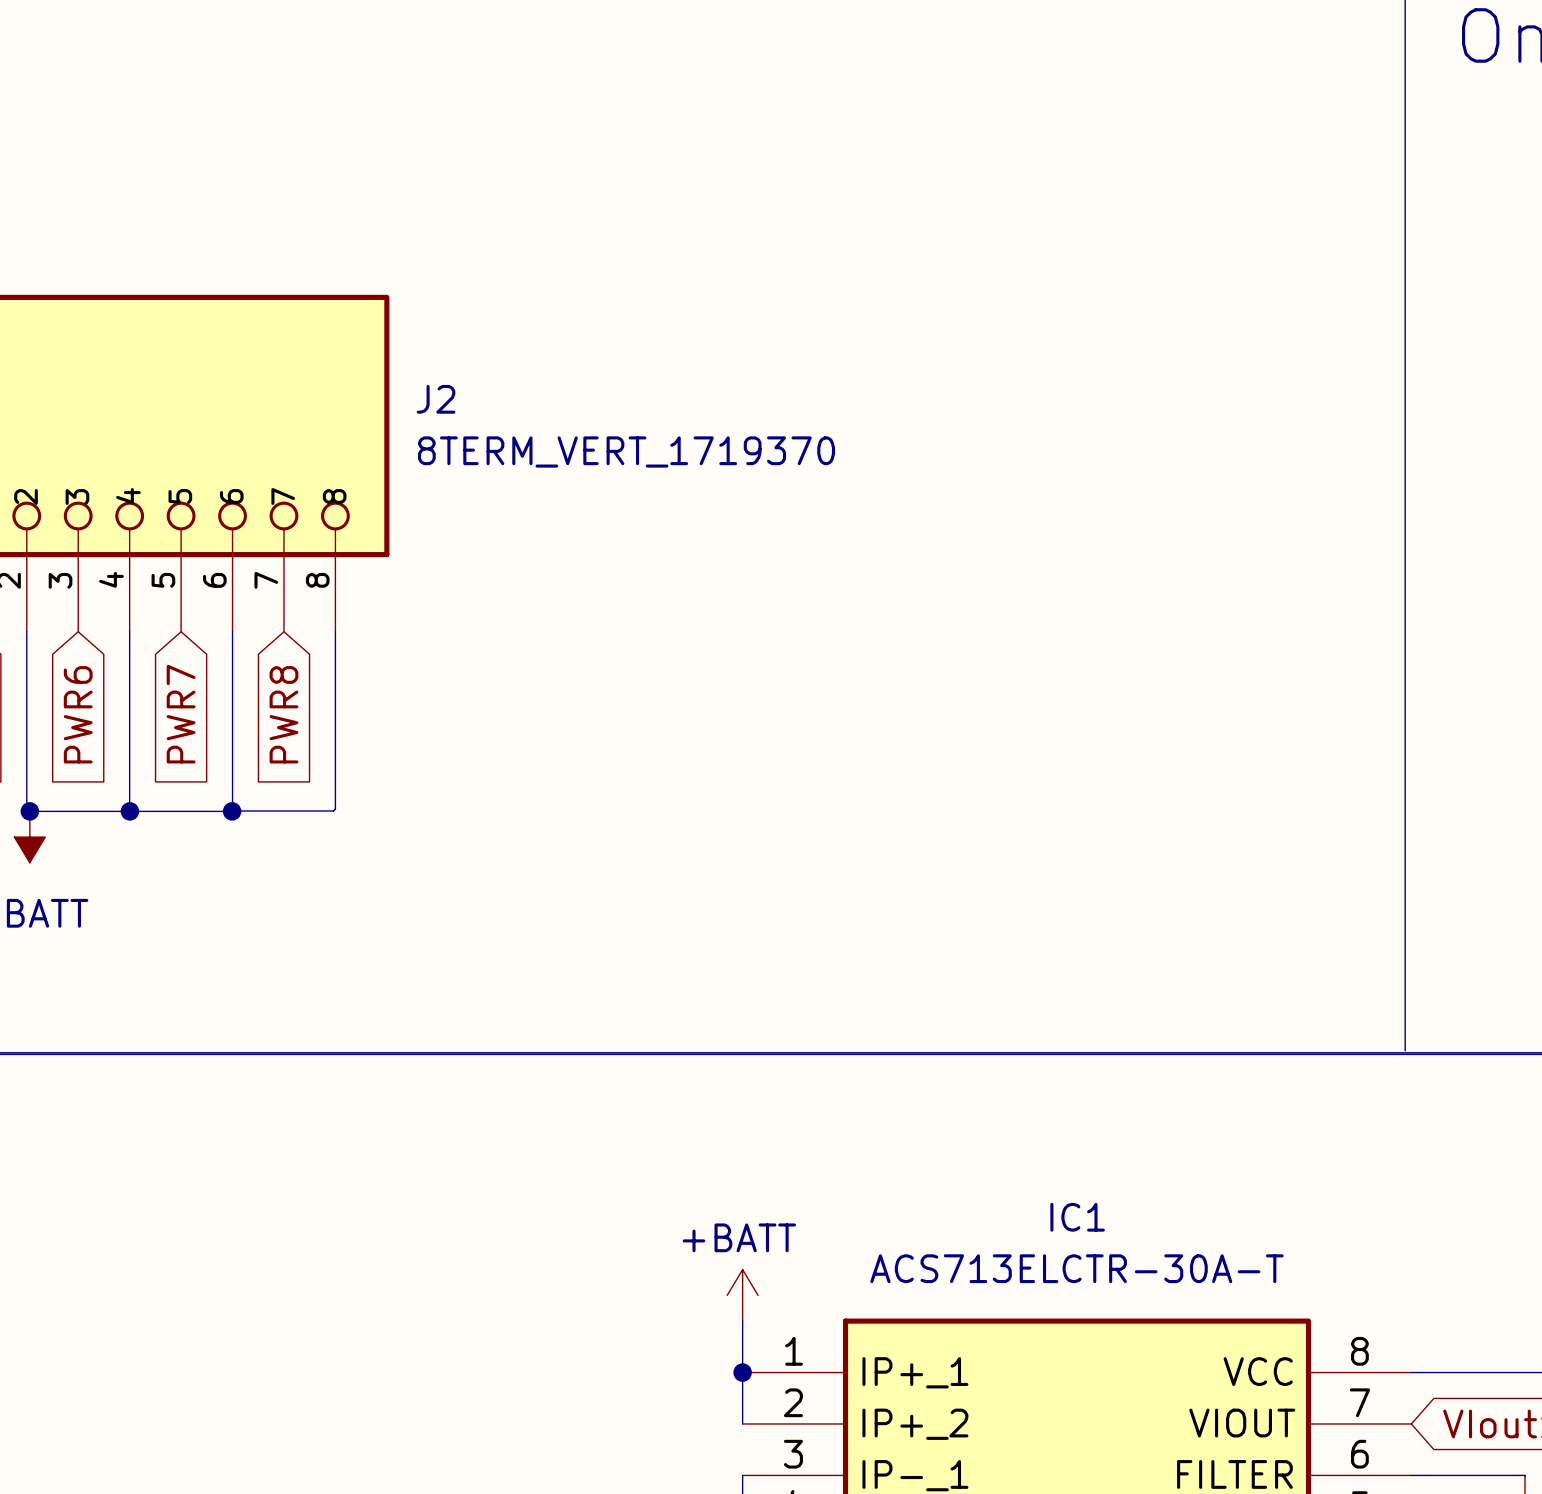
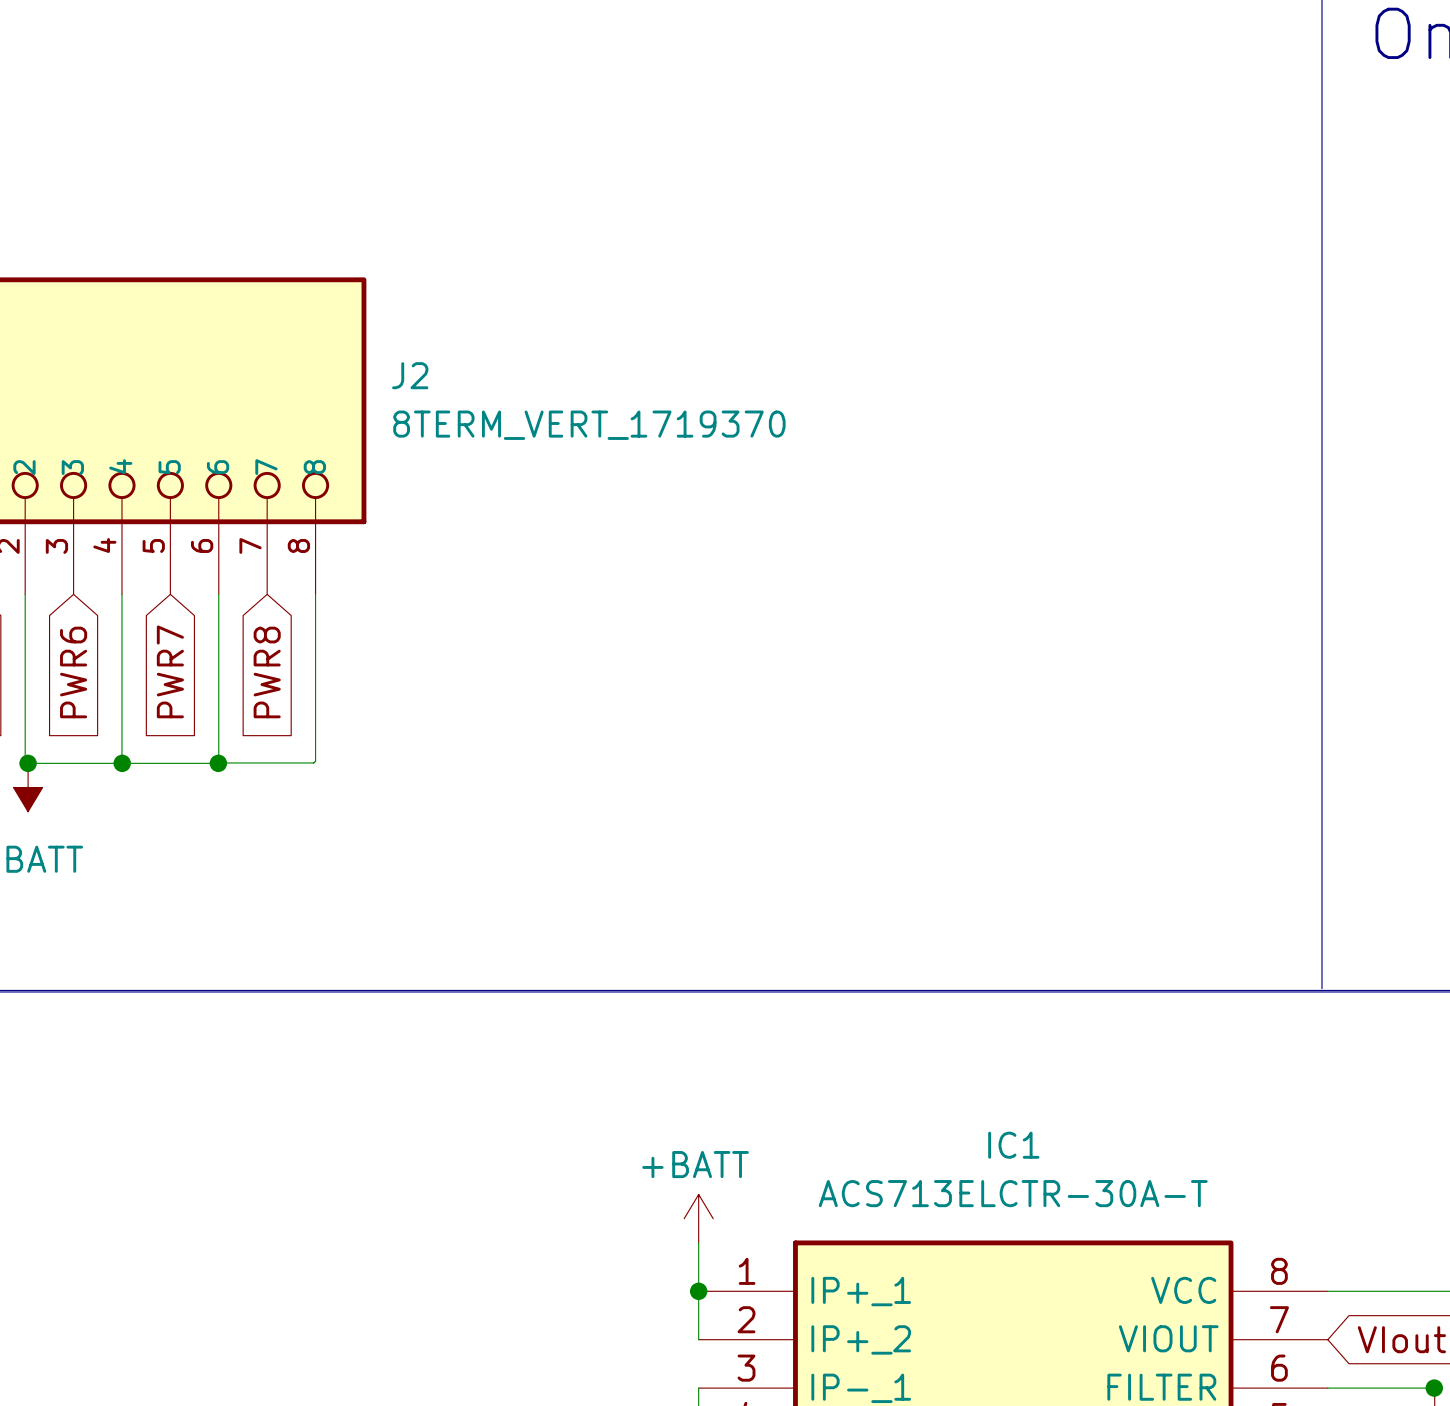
junction: none -> (1434, 1388)

